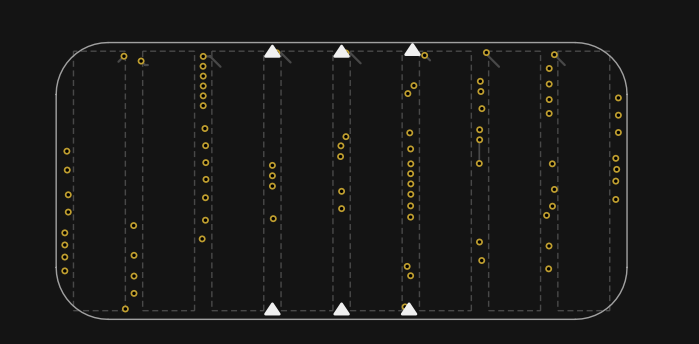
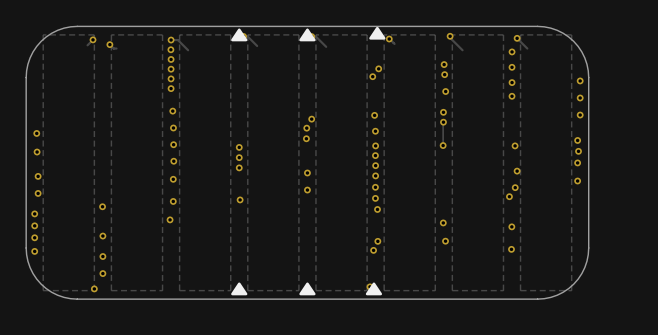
via: none -> (377, 209)
via: none -> (377, 241)
via: (407, 266) -> none
via: none -> (373, 250)
via: (410, 275) -> none

